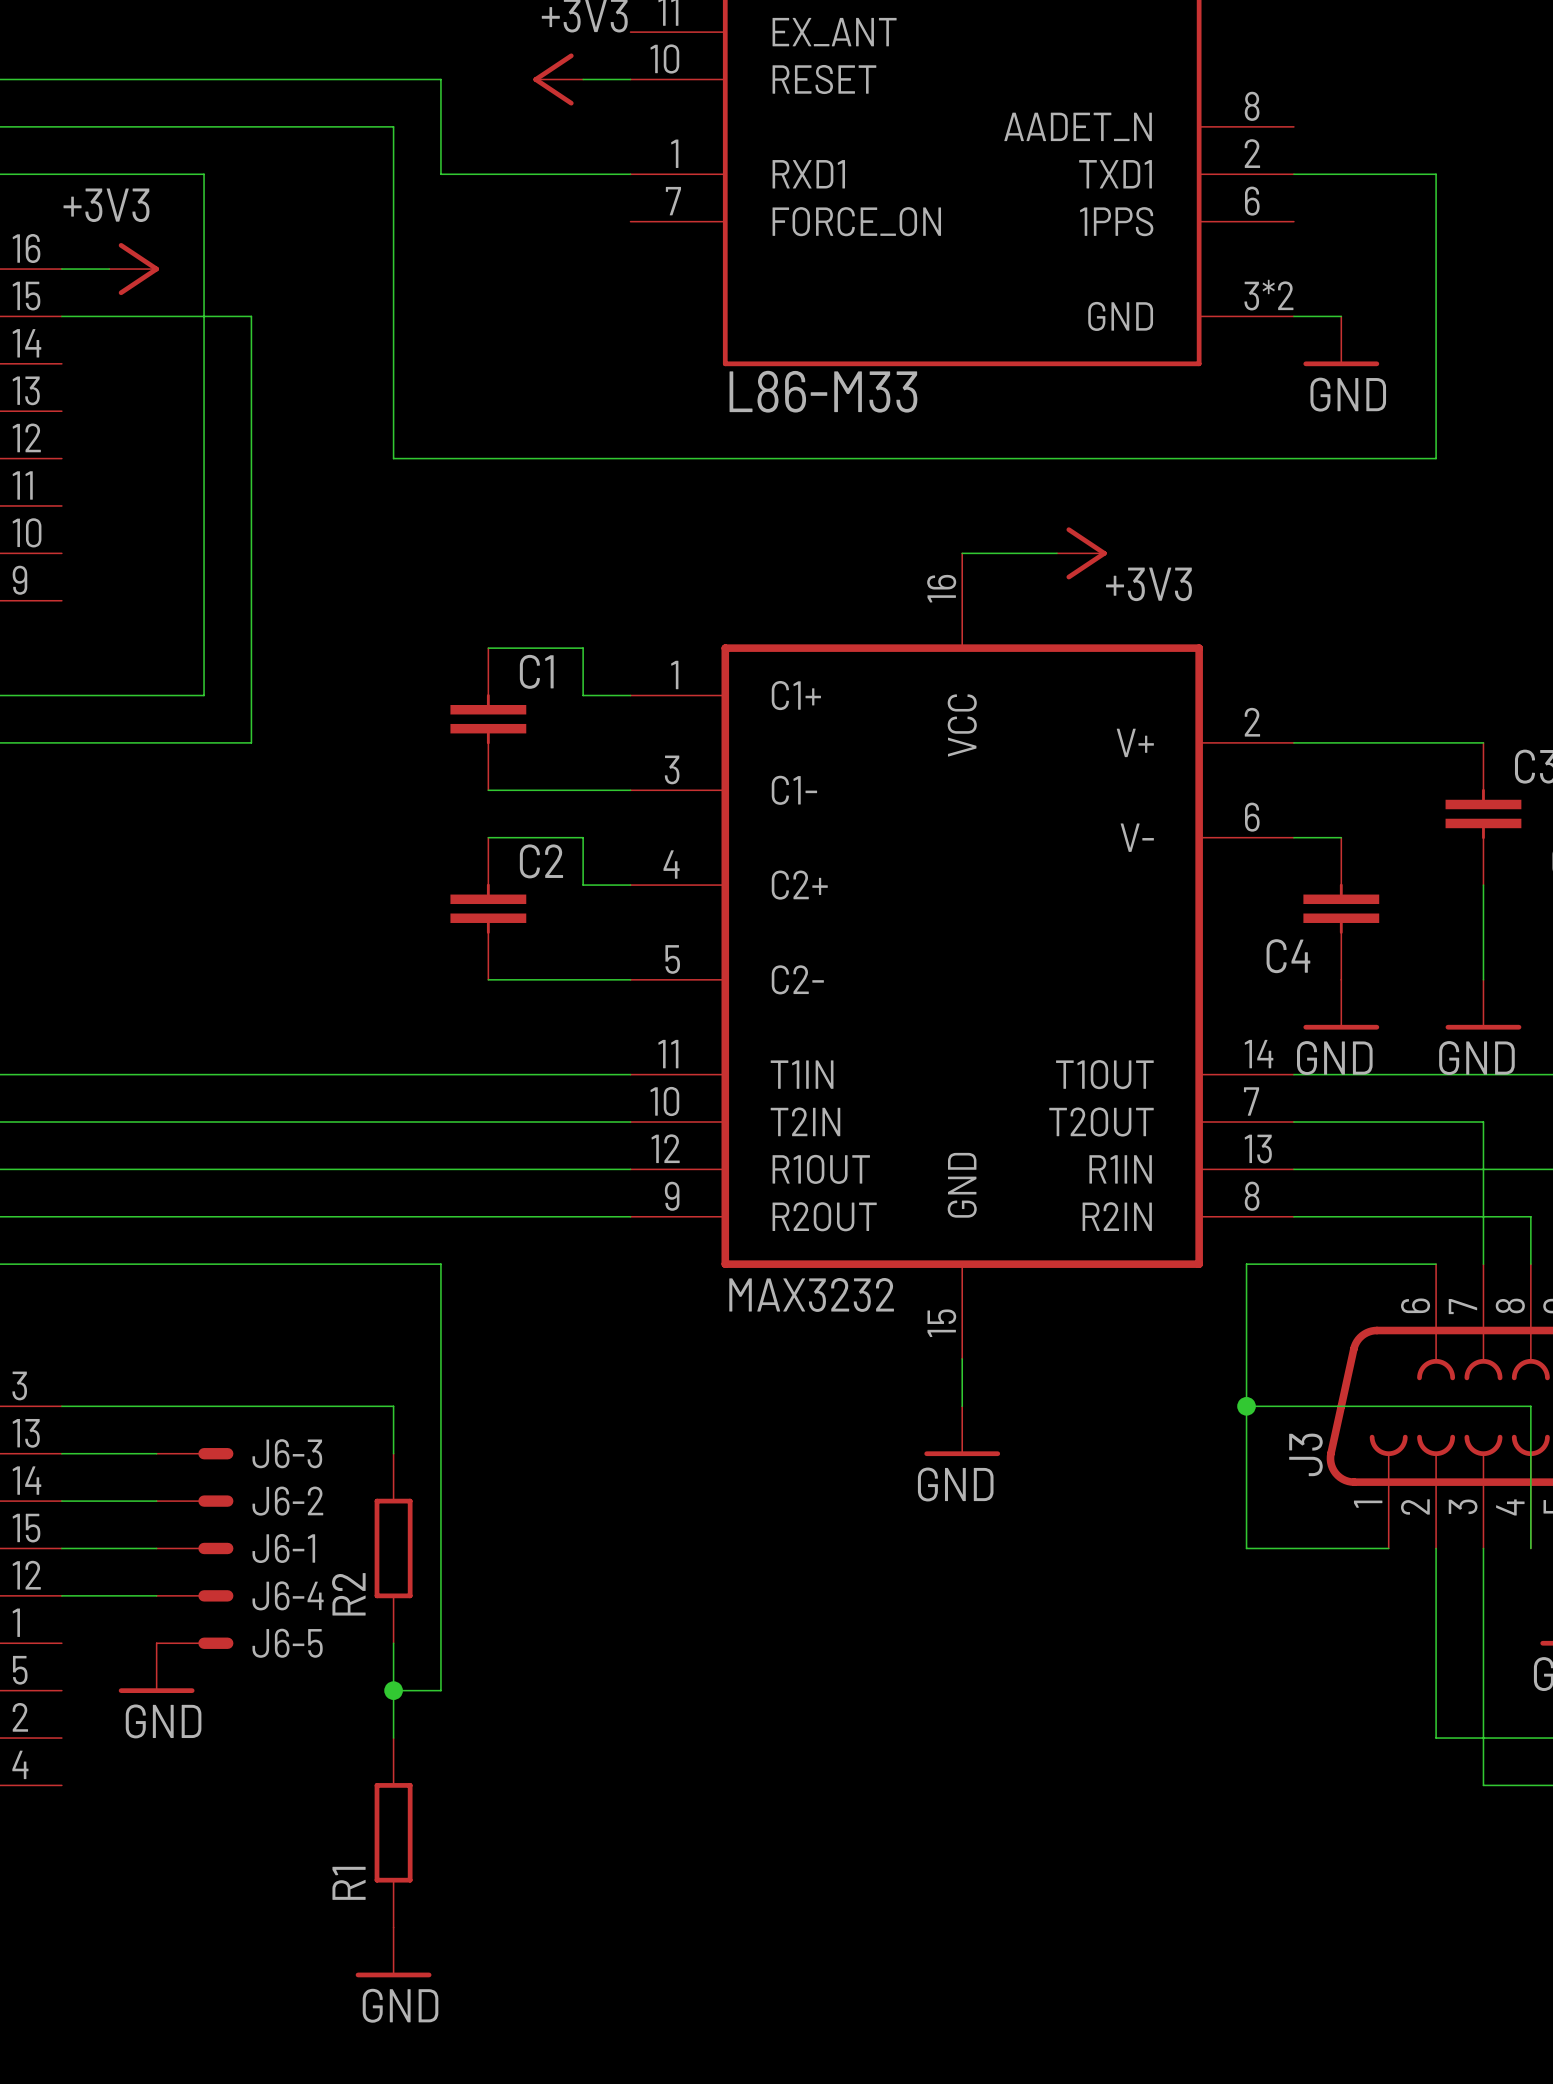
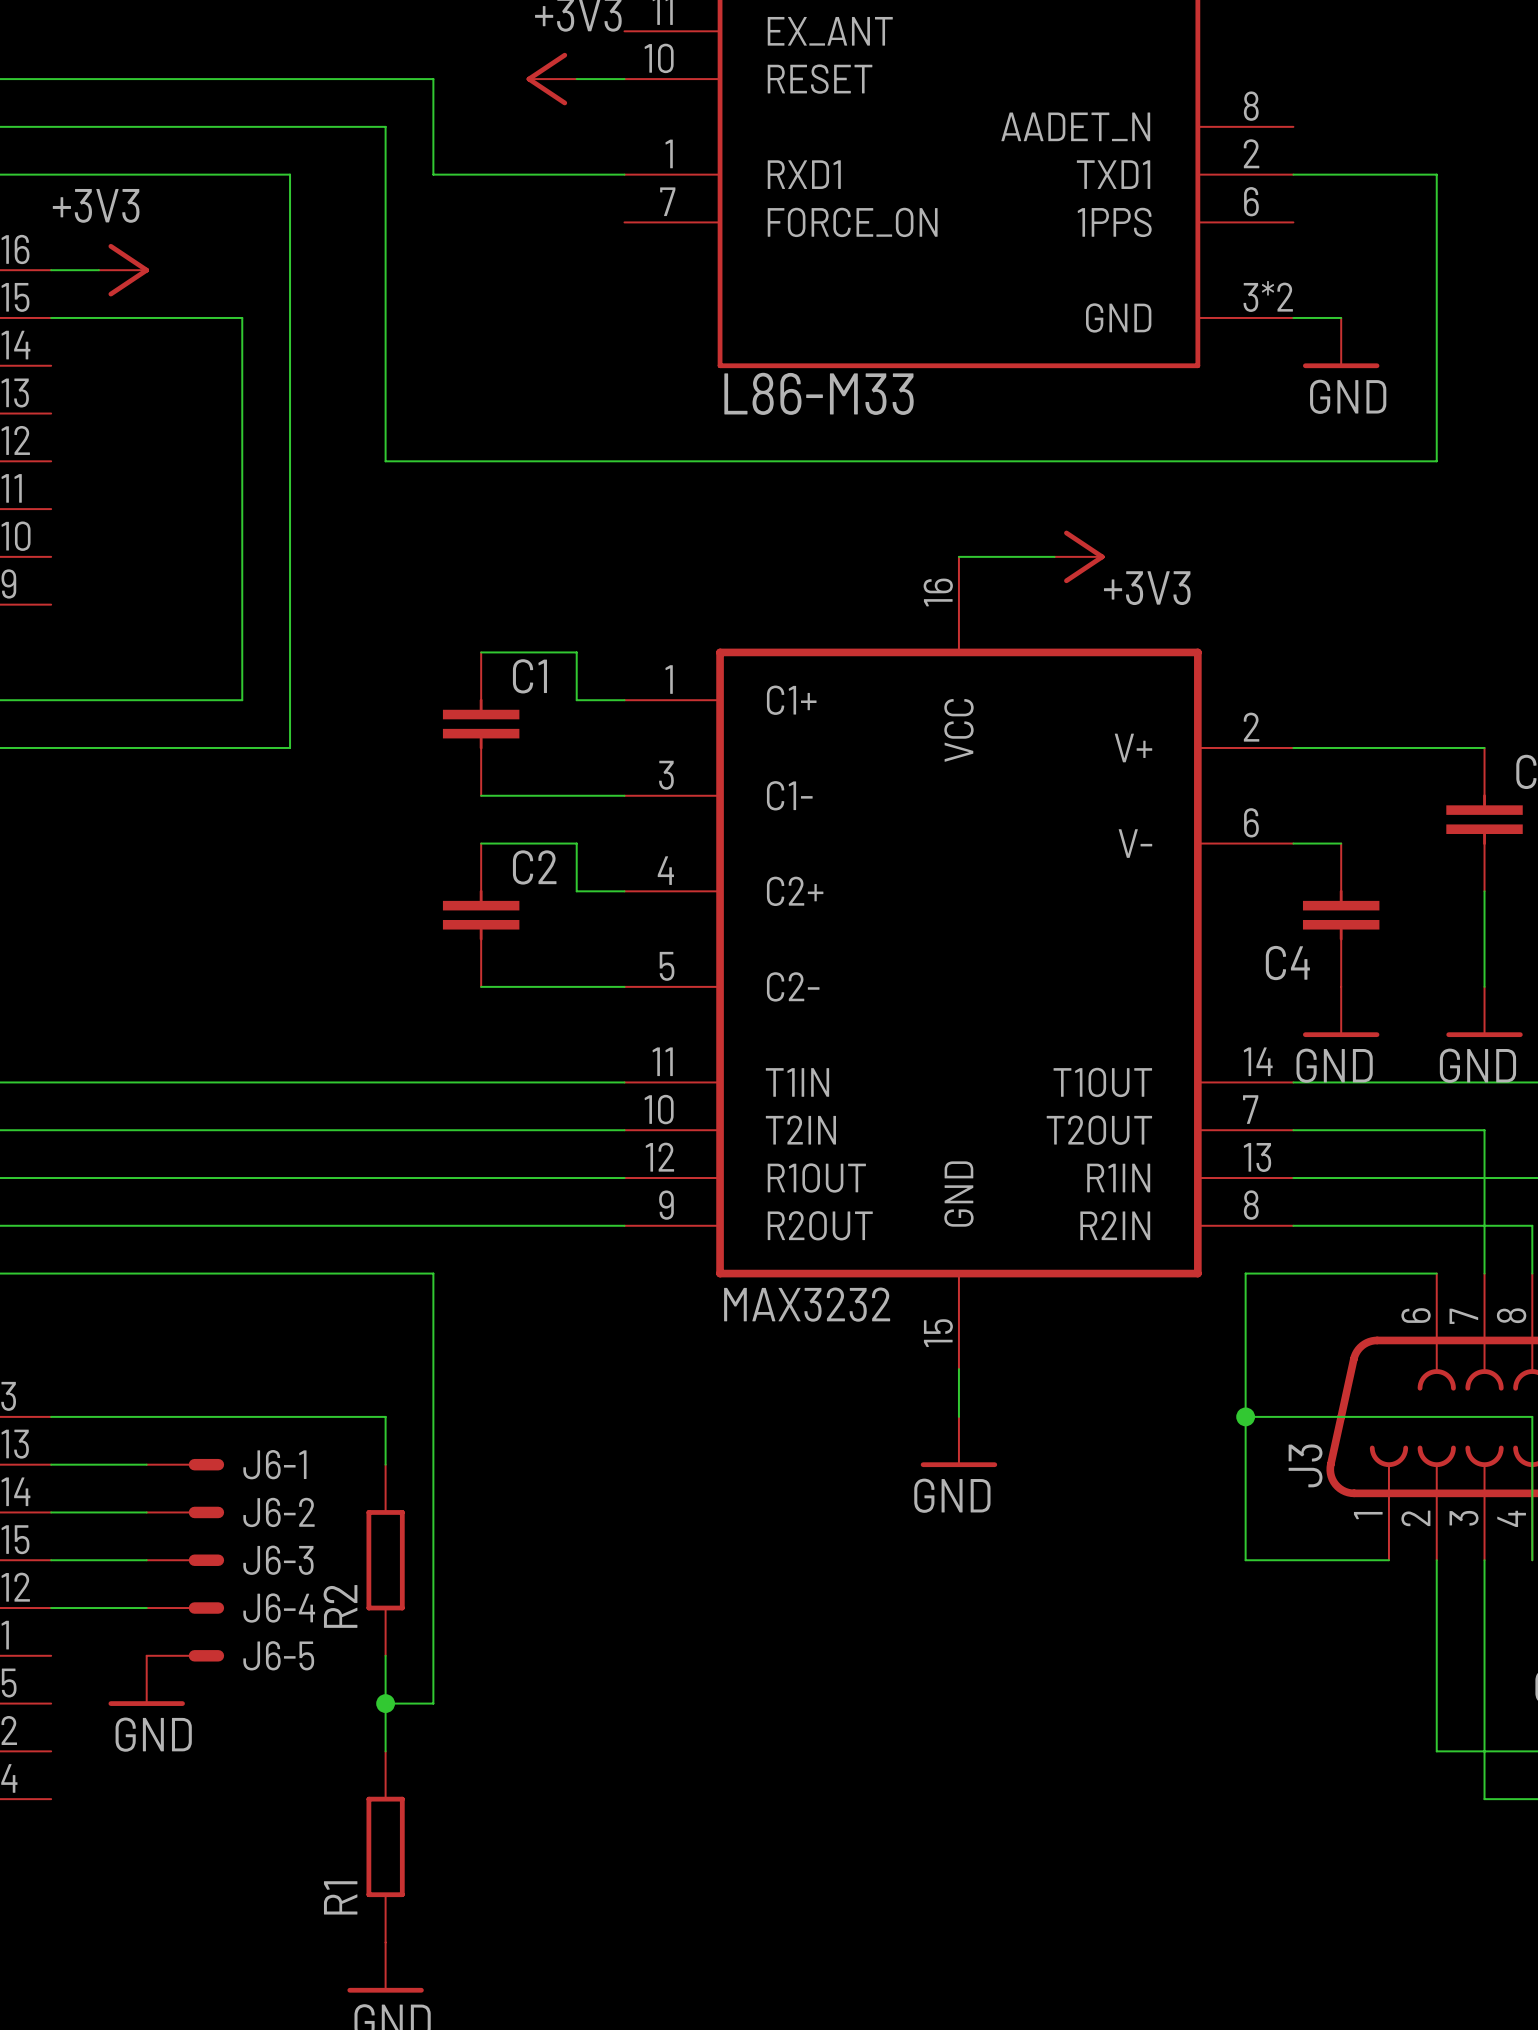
wire: (204, 174) (204, 695) -> (194, 174) (290, 174) (290, 747) (242, 747)
wire: (251, 695) (251, 742) -> (242, 700) (194, 700)
J6-3 name: J6-3 (287, 1453) -> J6-1 (274, 1464)
J6-1 name: J6-1 (283, 1548) -> J6-3 (278, 1560)

